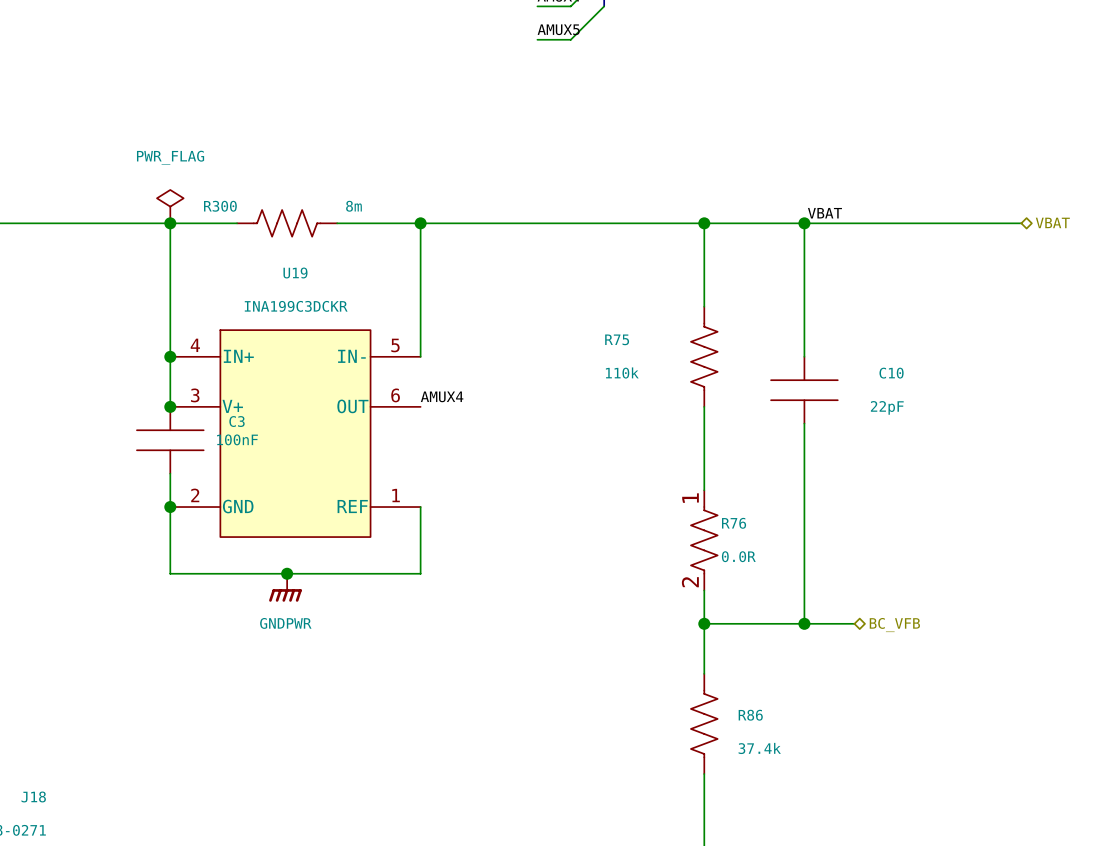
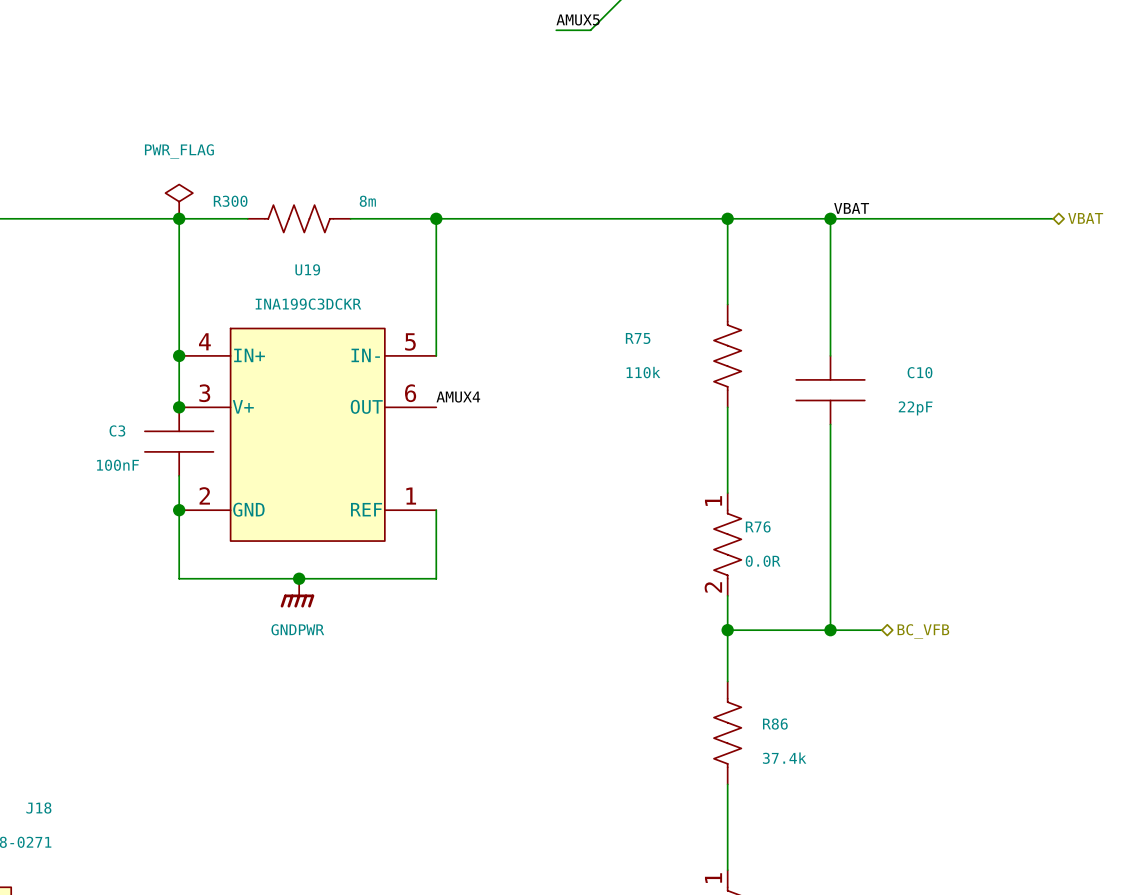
U19 symbol: [170, 330, 421, 538] -> [179, 328, 437, 542]
C3 name position: C3 (237, 421) -> C3 (117, 430)
C3 value position: 100nF (237, 439) -> 100nF (117, 465)

